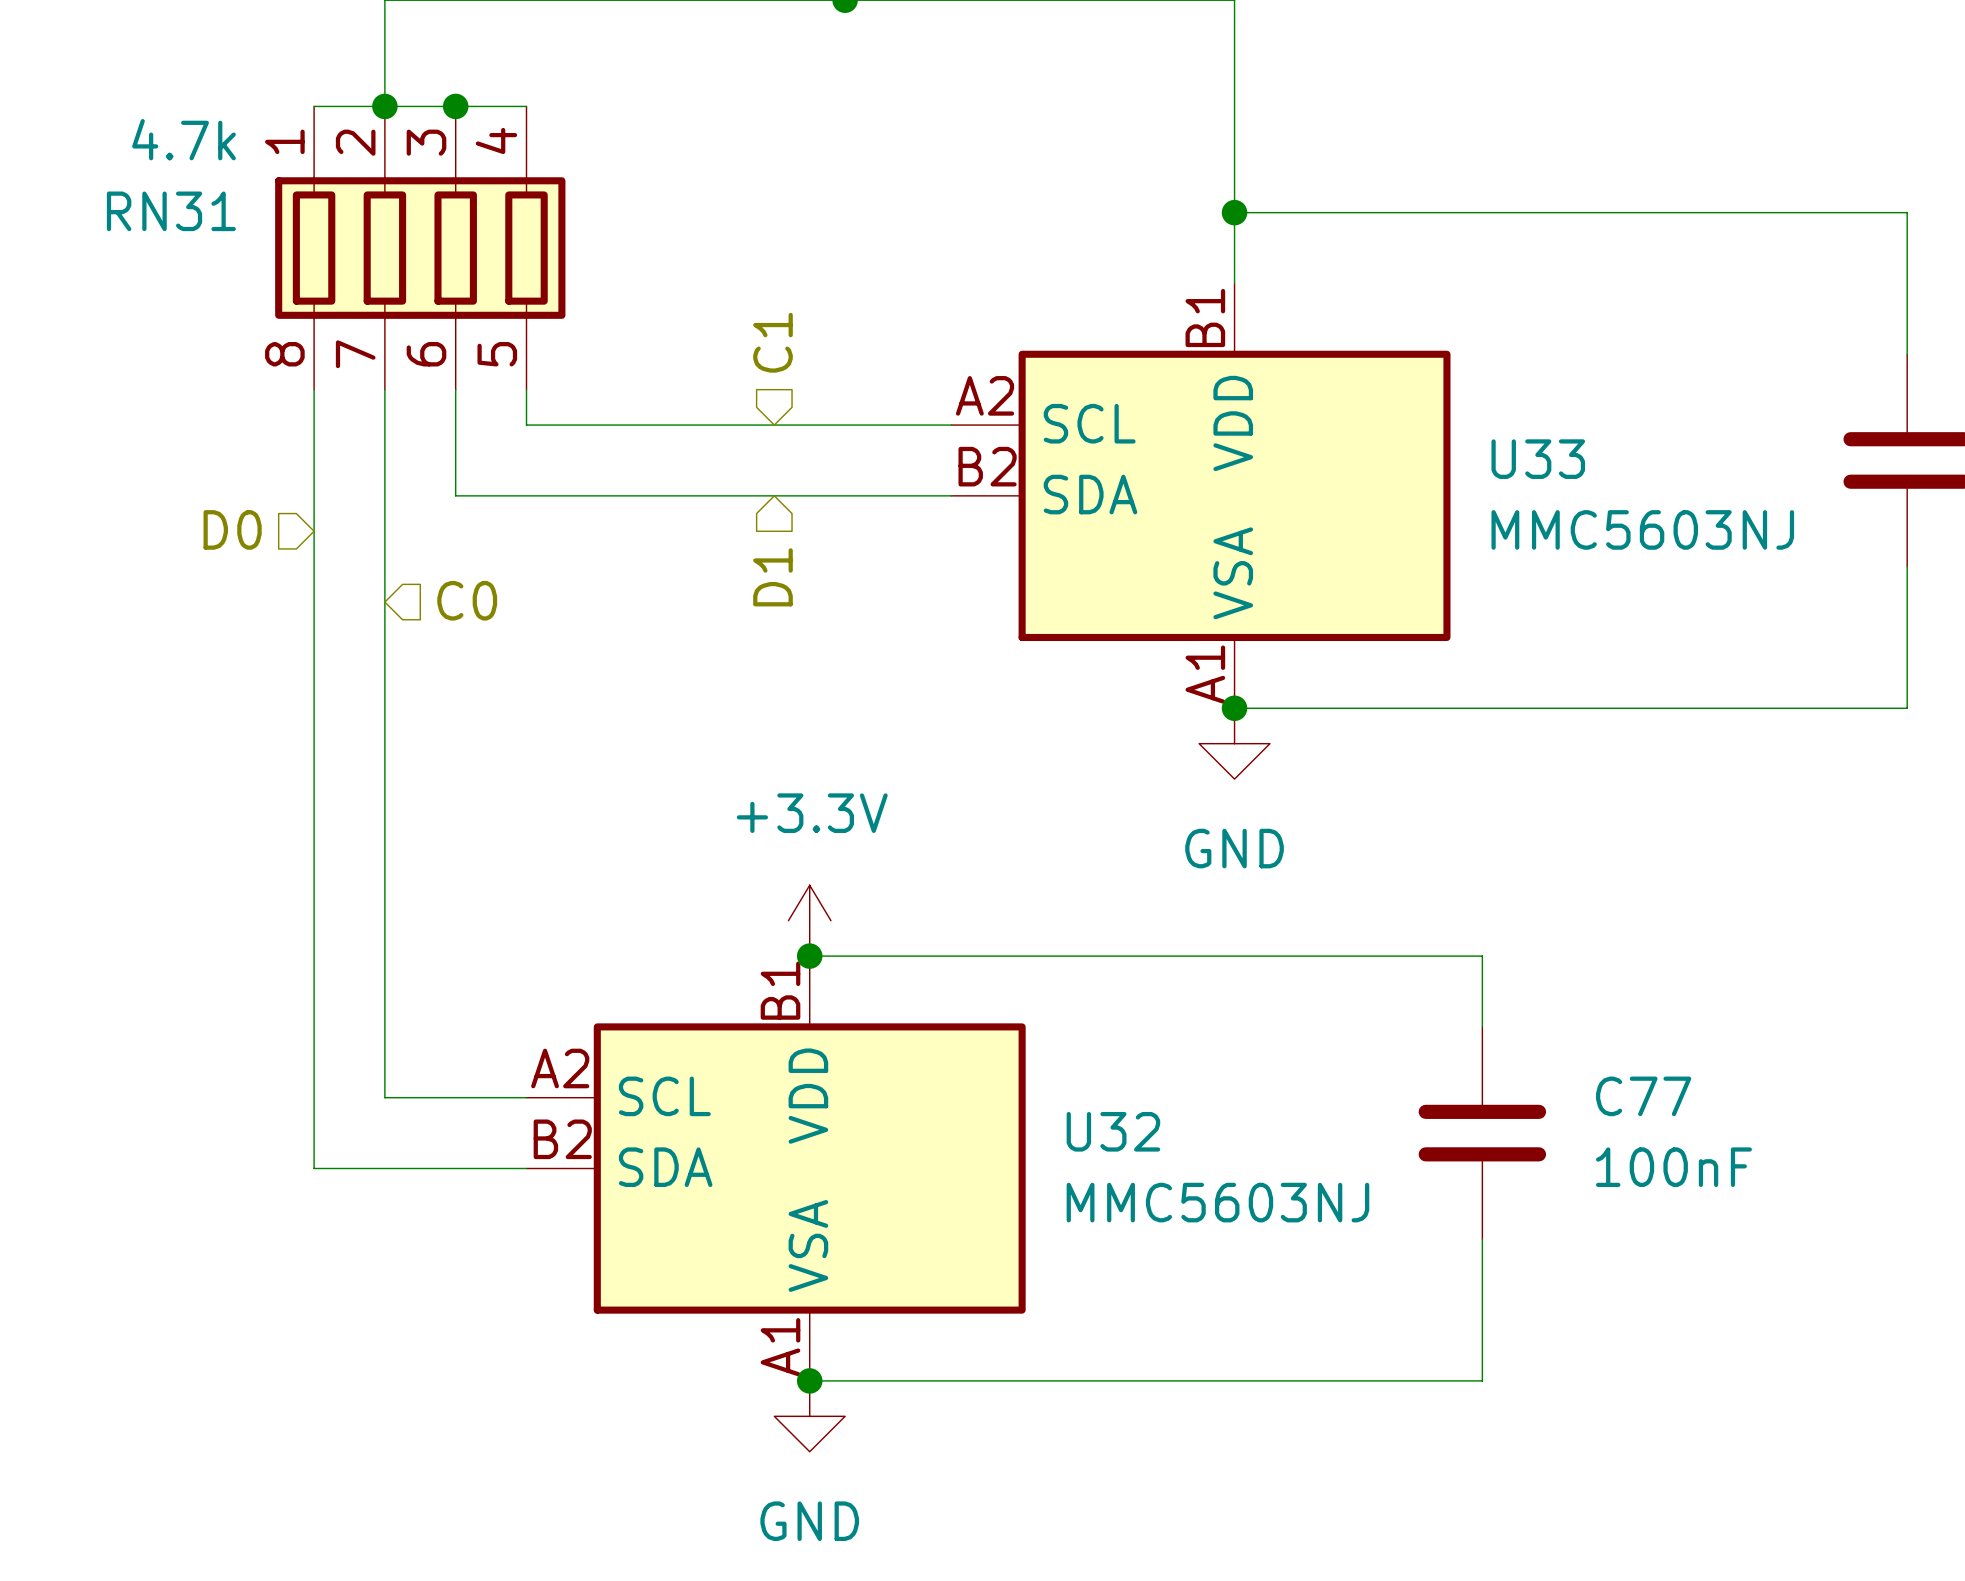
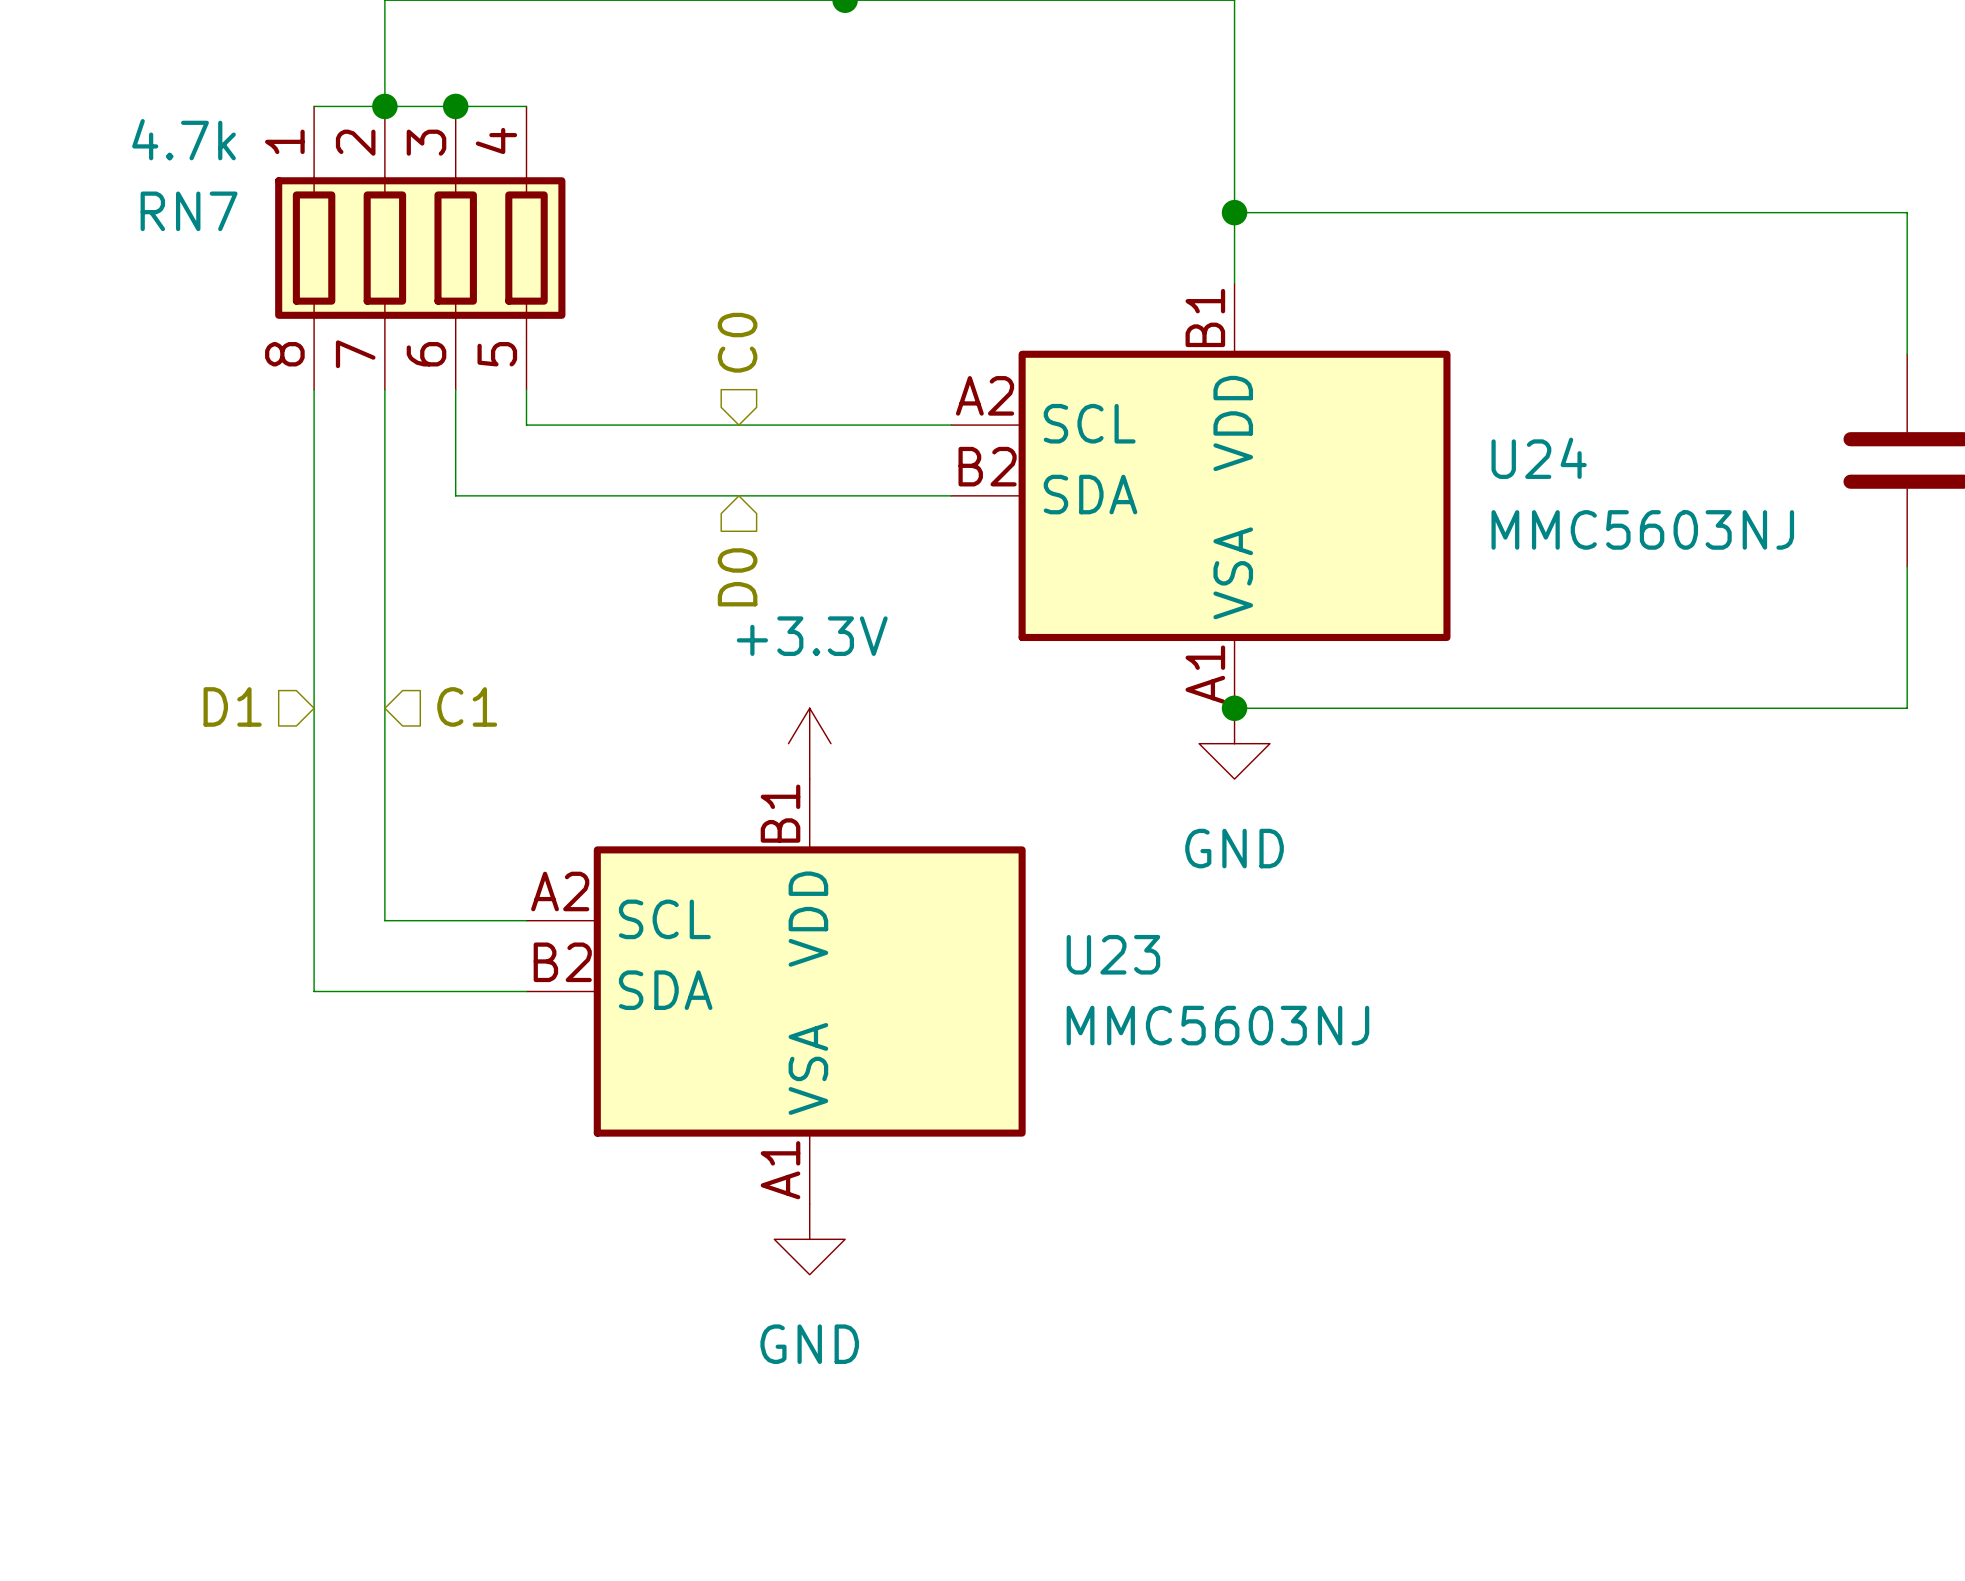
RN31 name: RN31 (171, 211) -> RN7 (189, 211)
hierarchical label rotation: 0° (772, 342) -> 90° clockwise (467, 706)
hierarchical label position: C1 (772, 342) -> C1 (467, 706)
U33 name: U33 (1538, 459) -> U24 (1539, 458)
hierarchical label rotation: 0° (232, 529) -> 90° counterclockwise (737, 577)
hierarchical label position: D0 (232, 529) -> D0 (737, 577)
hierarchical label rotation: 0° (772, 577) -> 90° clockwise (232, 706)
hierarchical label position: D1 (772, 577) -> D1 (232, 706)
hierarchical label rotation: 0° (467, 600) -> 90° counterclockwise (737, 342)
hierarchical label position: C0 (467, 600) -> C0 (737, 342)
wire: (384, 920) (384, 1097) (526, 1097) -> (384, 920) (526, 920)
power symbol position: +3.3V (809, 920) -> +3.3V (809, 743)
wire: (809, 956) (1482, 956) (1482, 1026) -> none
junction: (809, 956) -> none
wire: (314, 991) (314, 1168) (526, 1168) -> (314, 991) (526, 991)
U23: none -> MMC5603NJ (776, 991)
C77: 100nF (1482, 1133) -> none
U32: MMC5603NJ (776, 1168) -> none
wire: (1482, 1239) (1482, 1380) (809, 1380) -> none
junction: (809, 1380) -> none
power symbol position: GND (809, 1416) -> GND (809, 1239)

